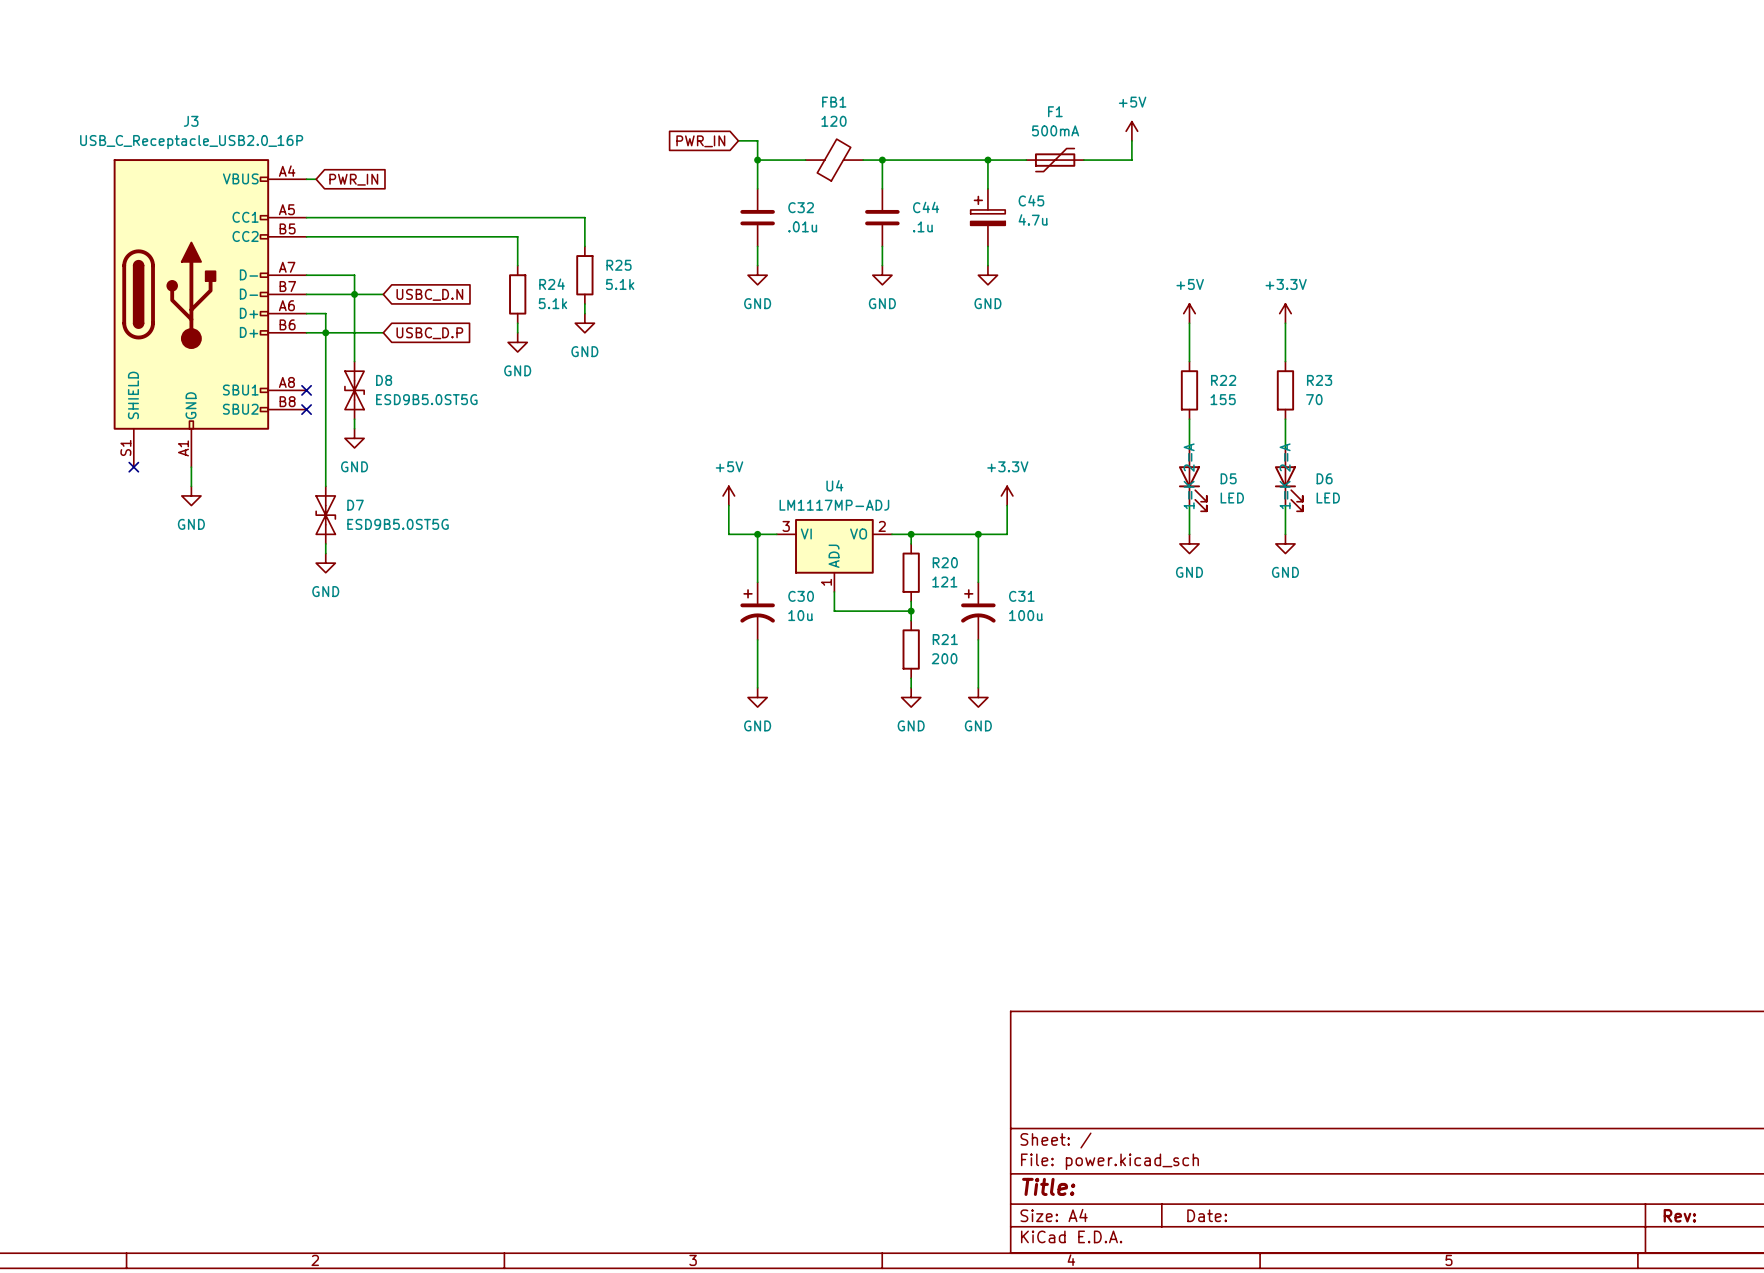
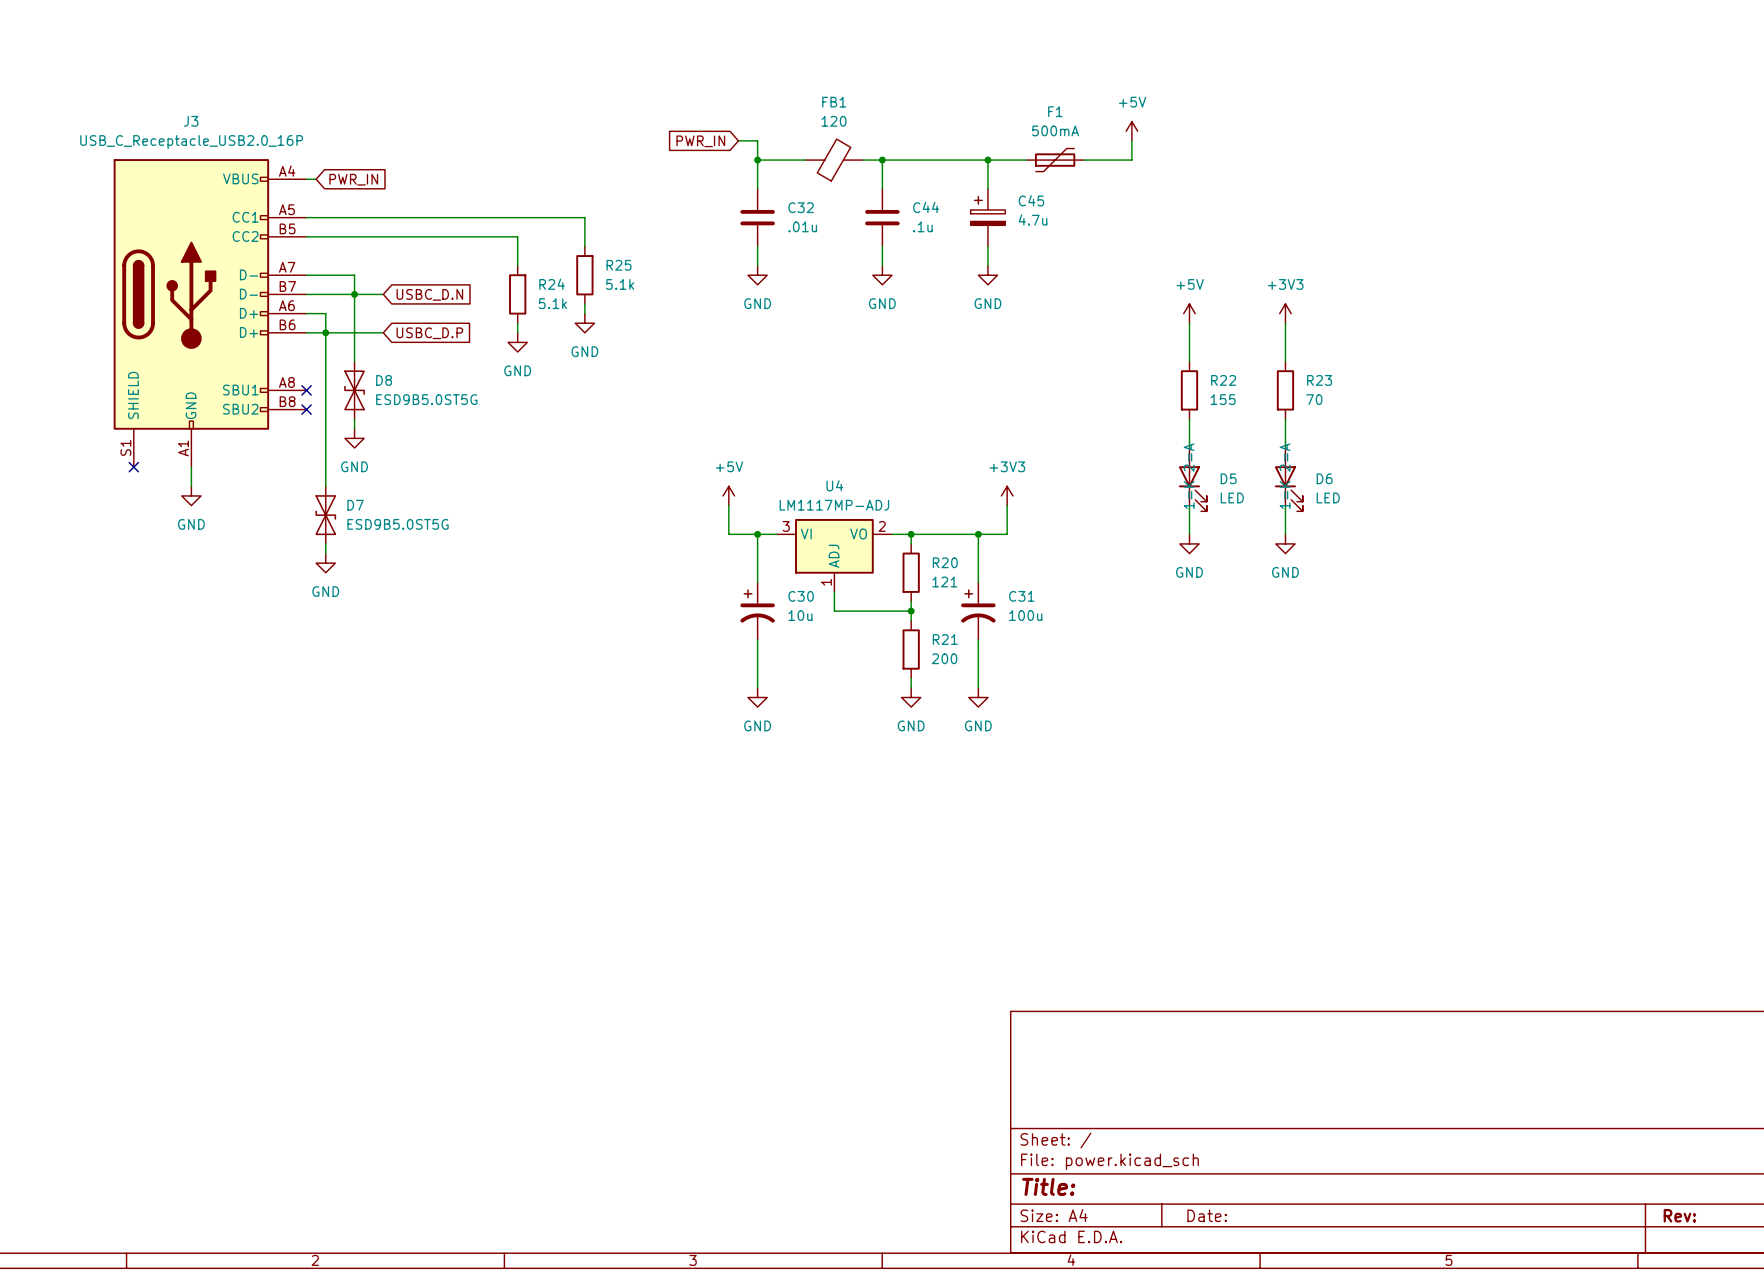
power symbol: +3.3V (1285, 313) -> +3V3 (1285, 313)
power symbol: +3.3V (1007, 495) -> +3V3 (1007, 495)

